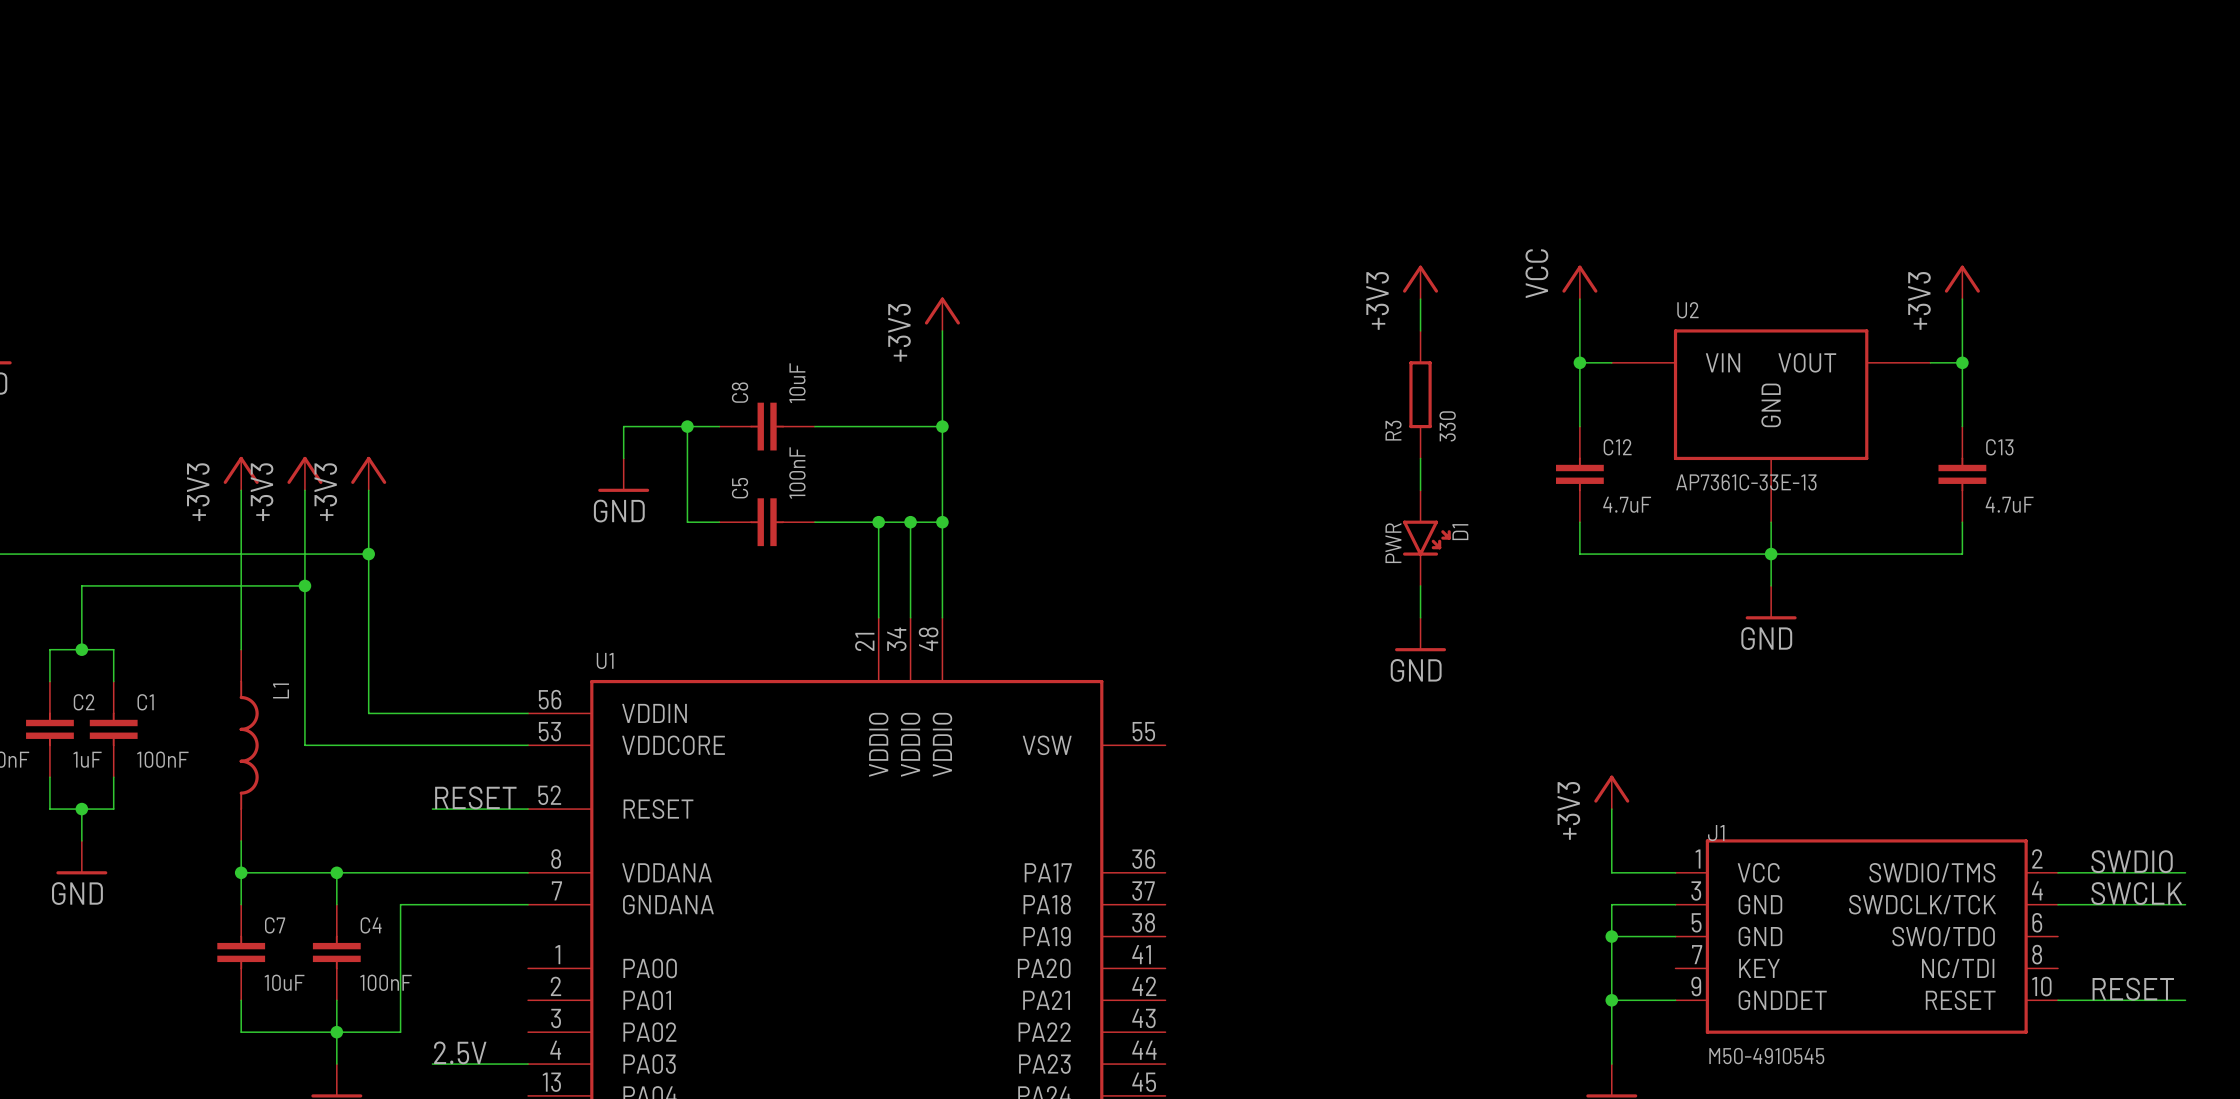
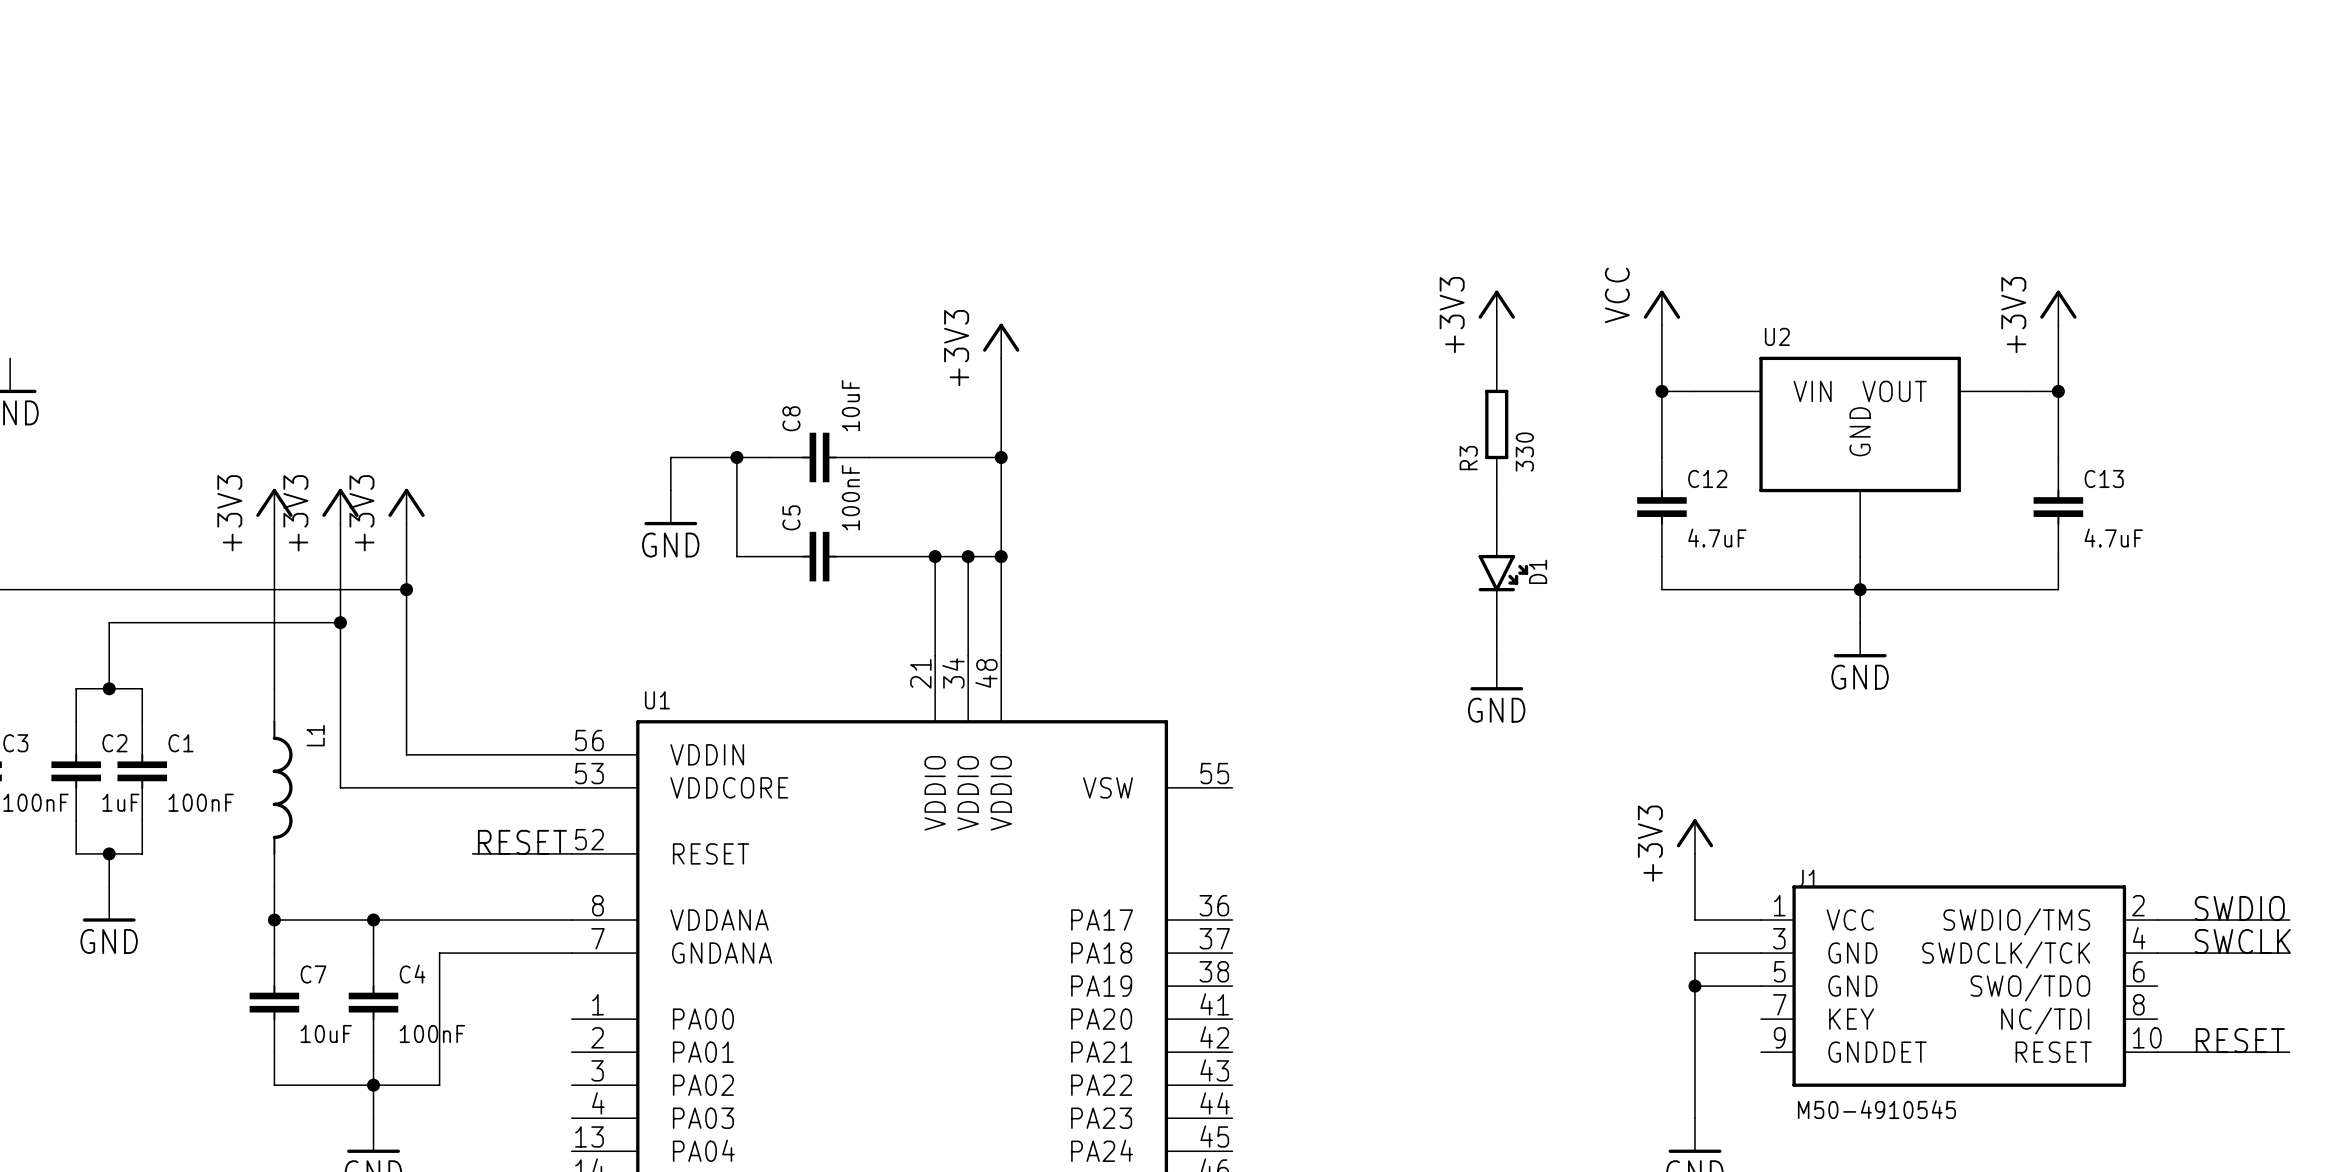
U2 value: AP7361C-33E-13 (1746, 482) -> none
D1 value: PWR (1393, 543) -> none
wire: (1611, 1000) (1675, 1000) -> none
junction: (1611, 1000) -> none
label: 2.5V (460, 1052) -> none
wire: (432, 1064) (528, 1064) -> none

